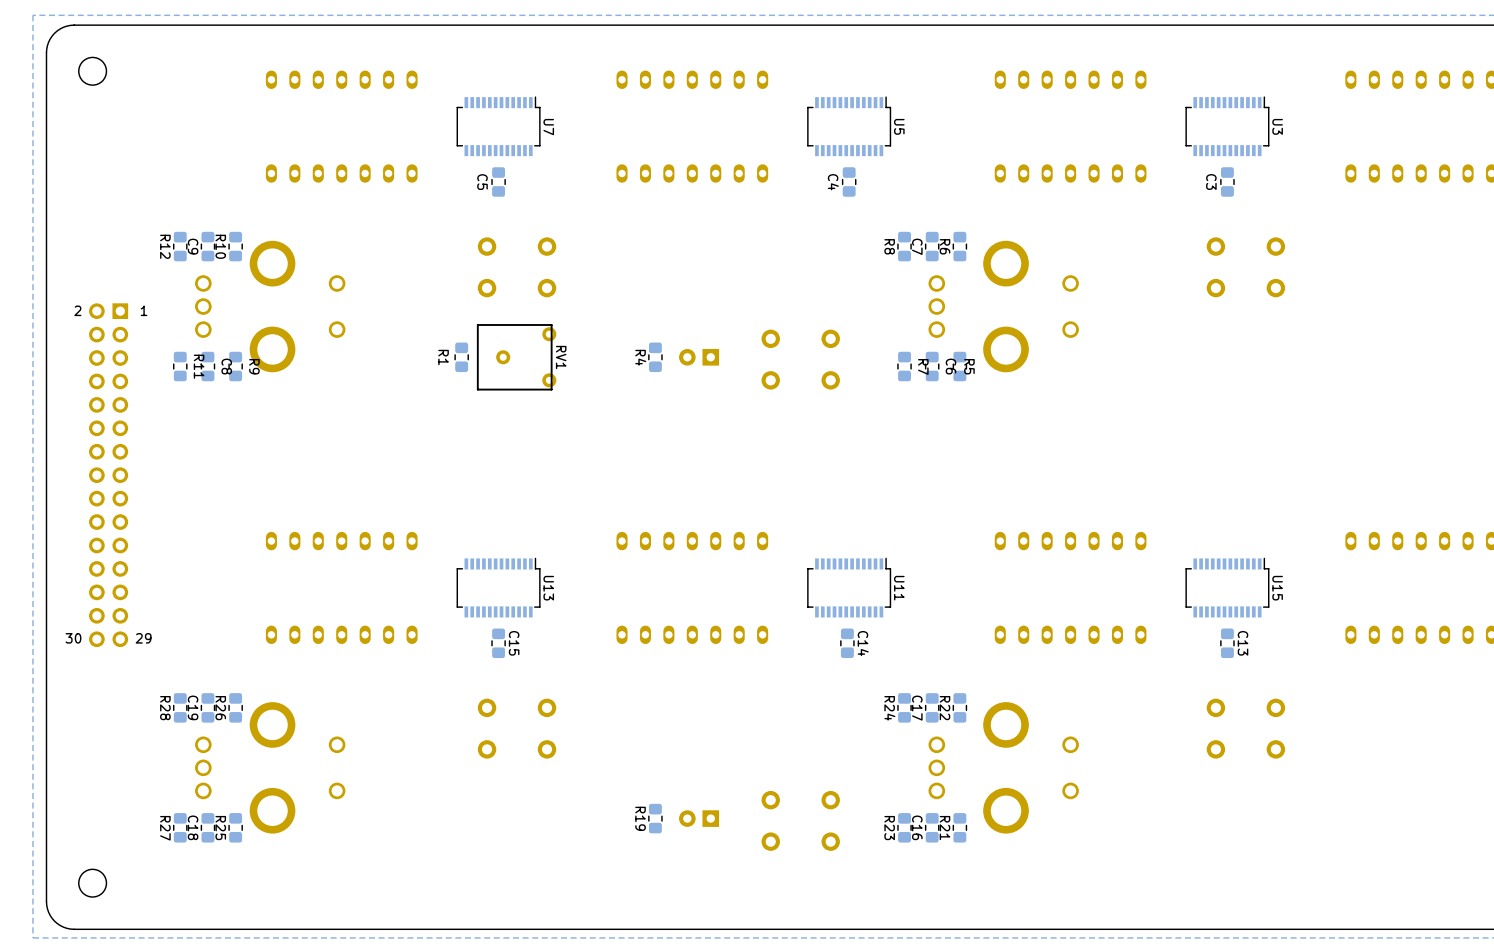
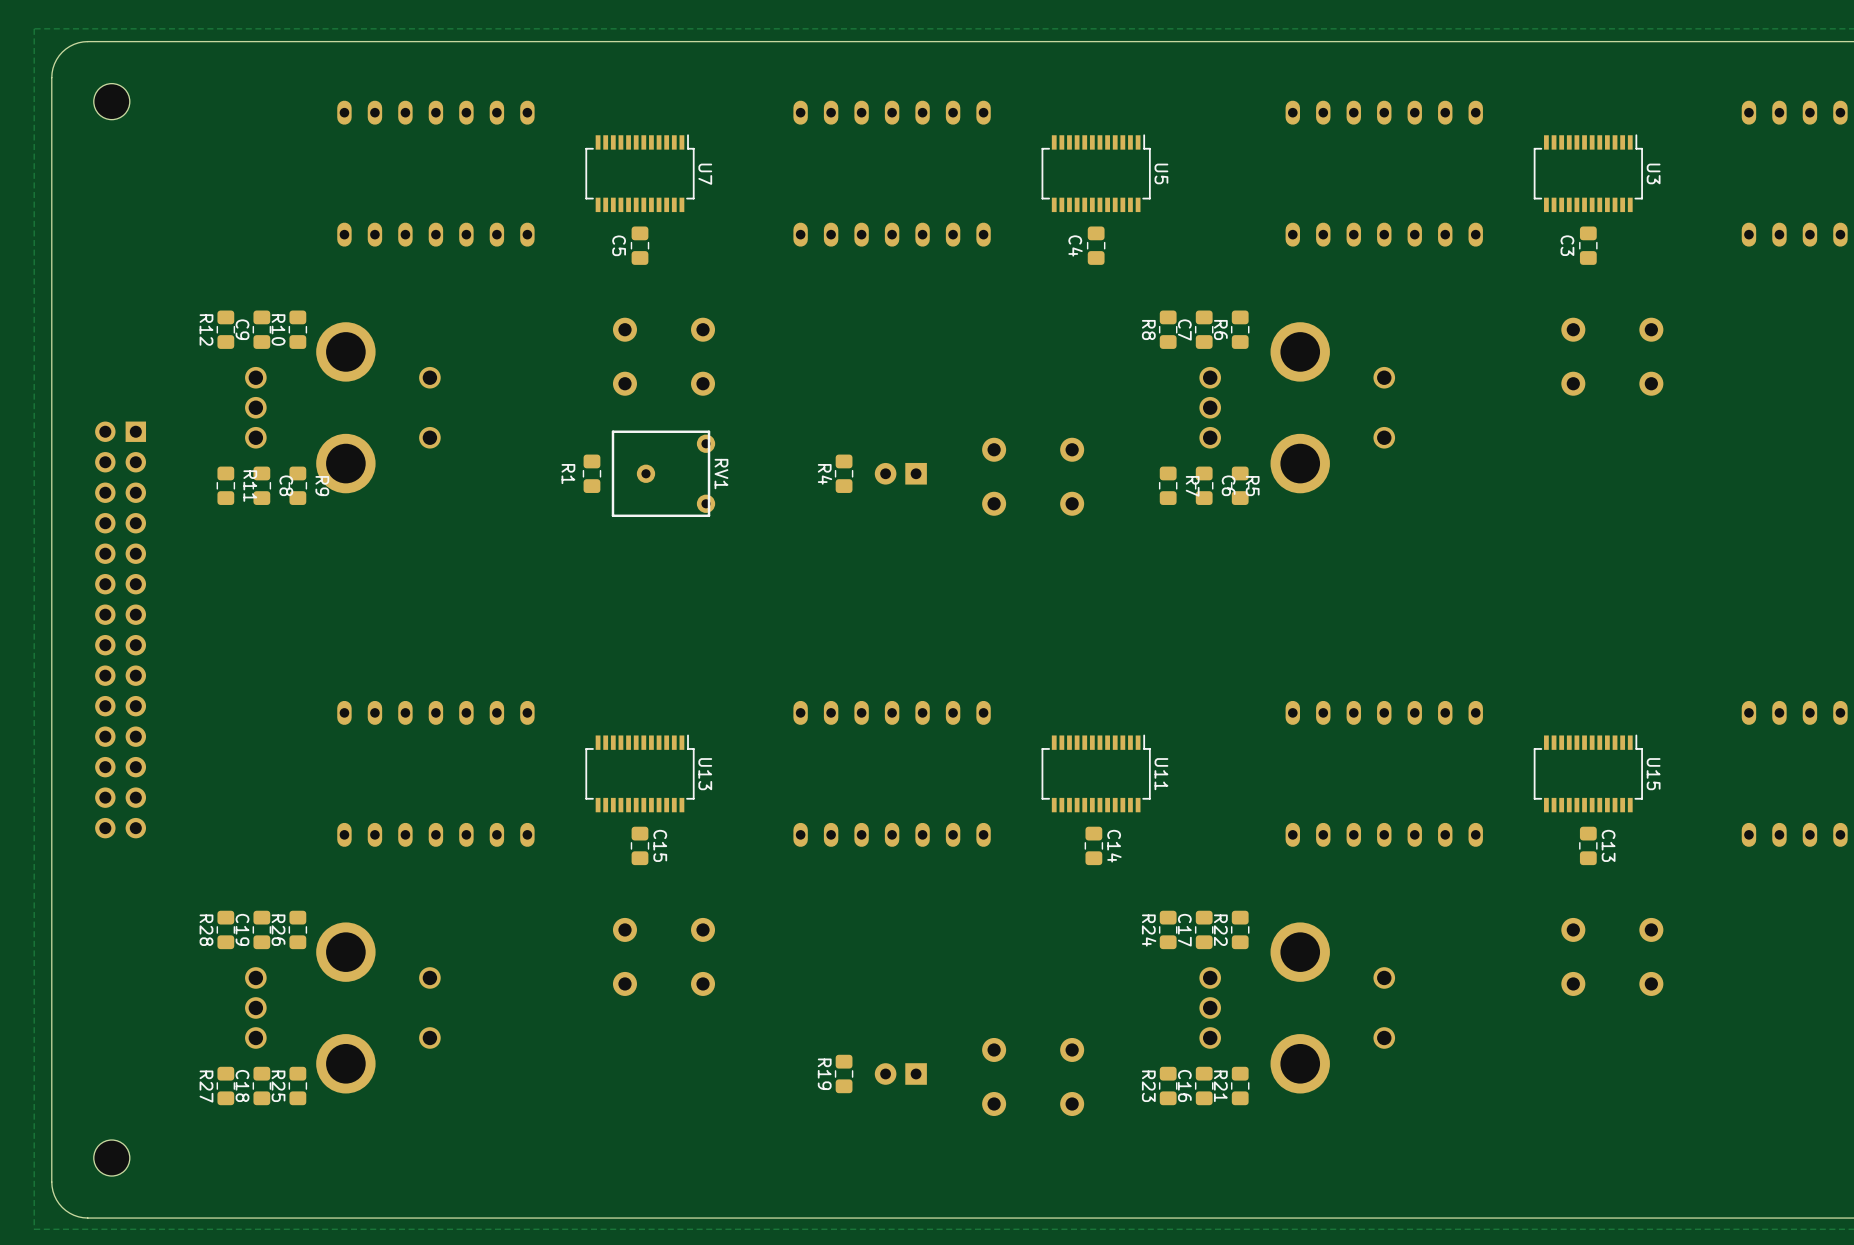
text: 2 (77, 310) -> none
text: 1 (144, 310) -> none
part: (108, 475) -> none
part: none -> (120, 629)
text: 30 (73, 638) -> none
text: 29 (143, 638) -> none

